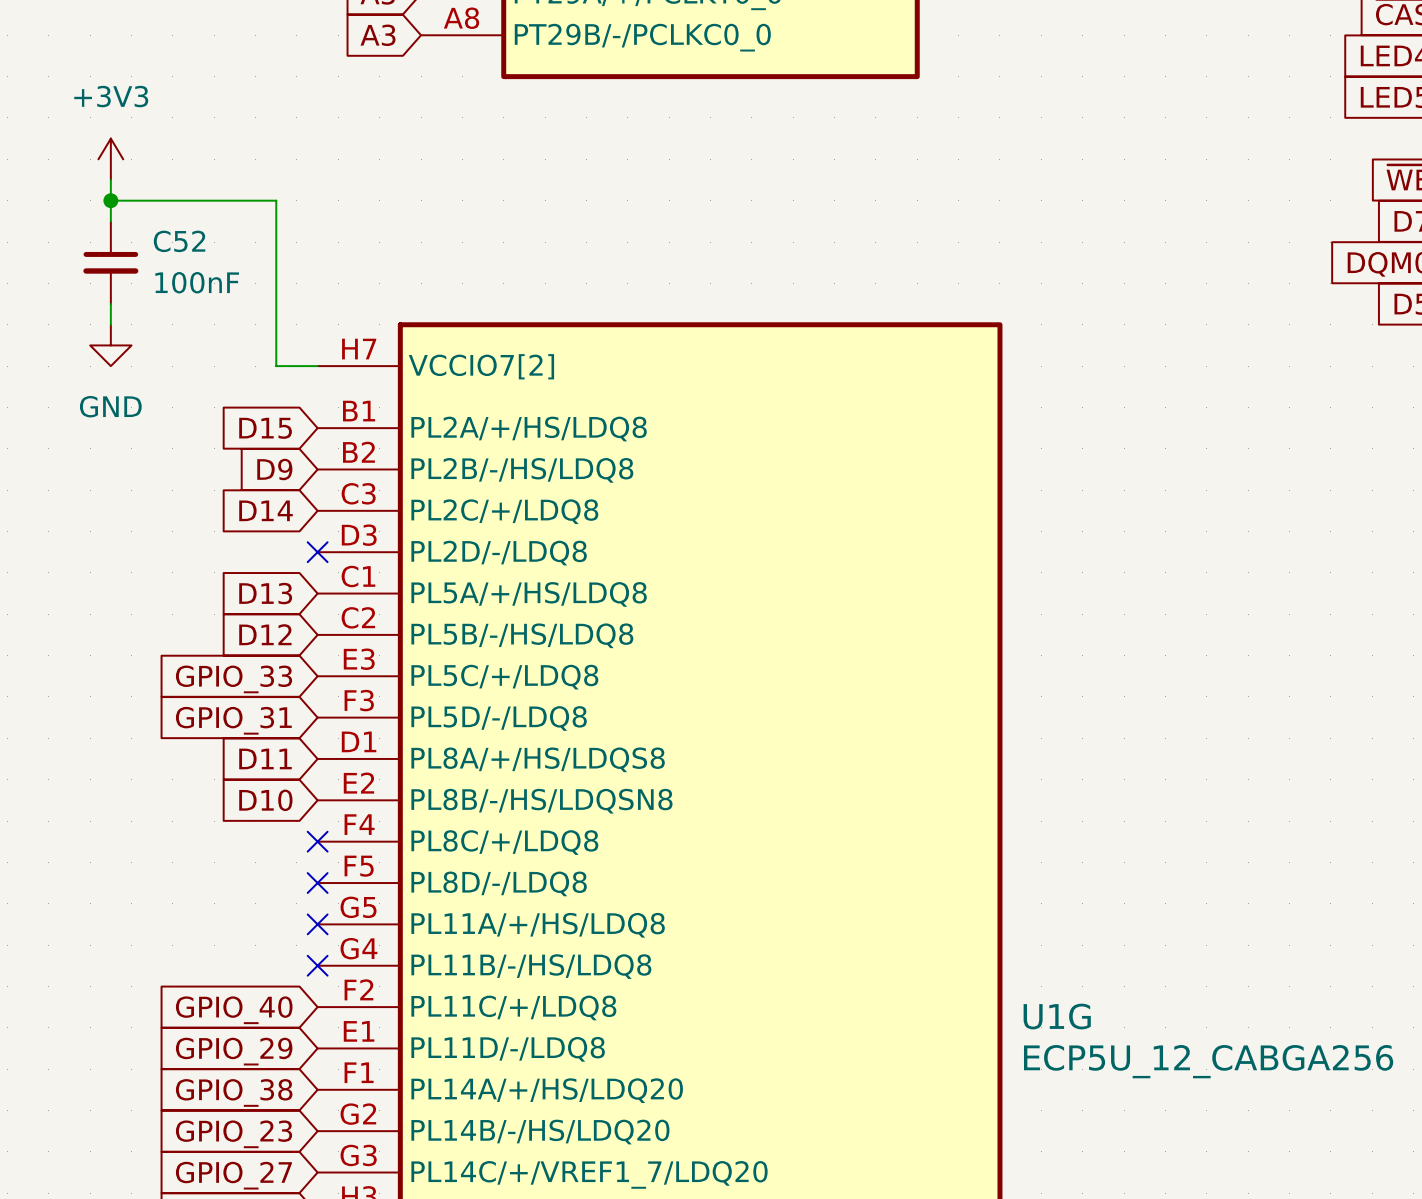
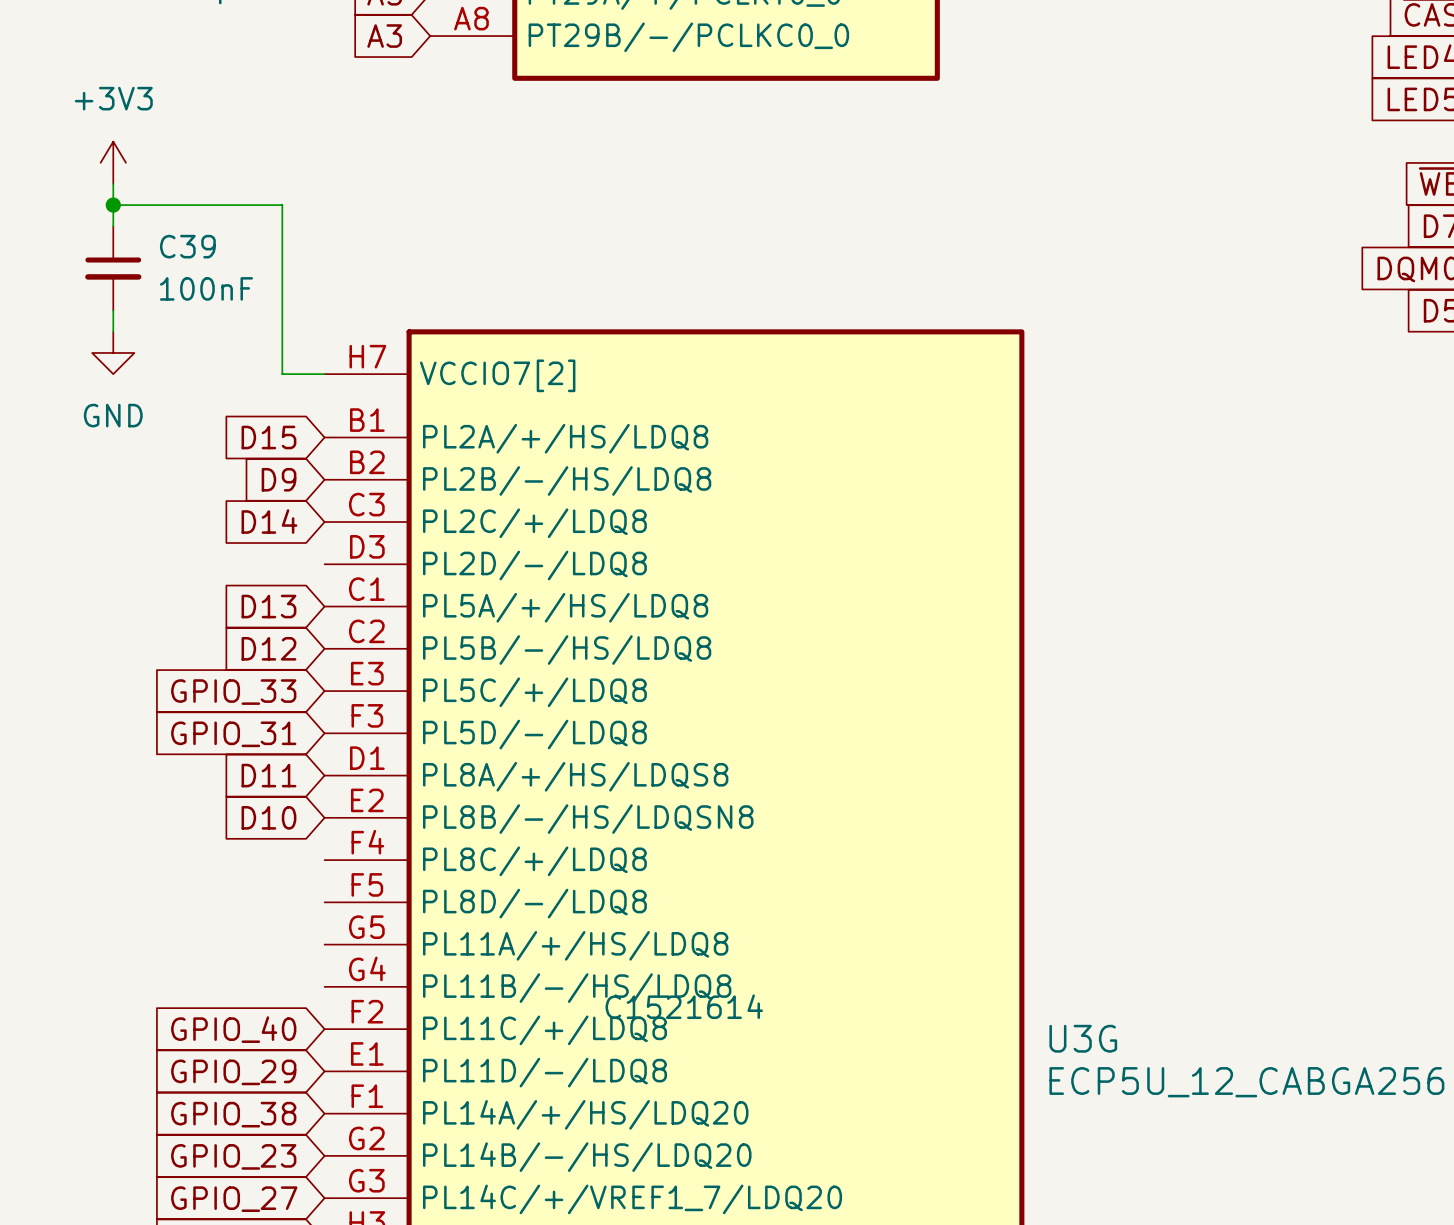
C52 name: C52 (179, 241) -> C39 (187, 246)
no-connect mark: (317, 552) -> none
no-connect mark: (317, 841) -> none
no-connect mark: (317, 883) -> none
no-connect mark: (317, 924) -> none
no-connect mark: (317, 965) -> none
U1G text: none -> C1521614 (684, 1006)
U1G name: U1G (1057, 1016) -> U3G (1083, 1038)

